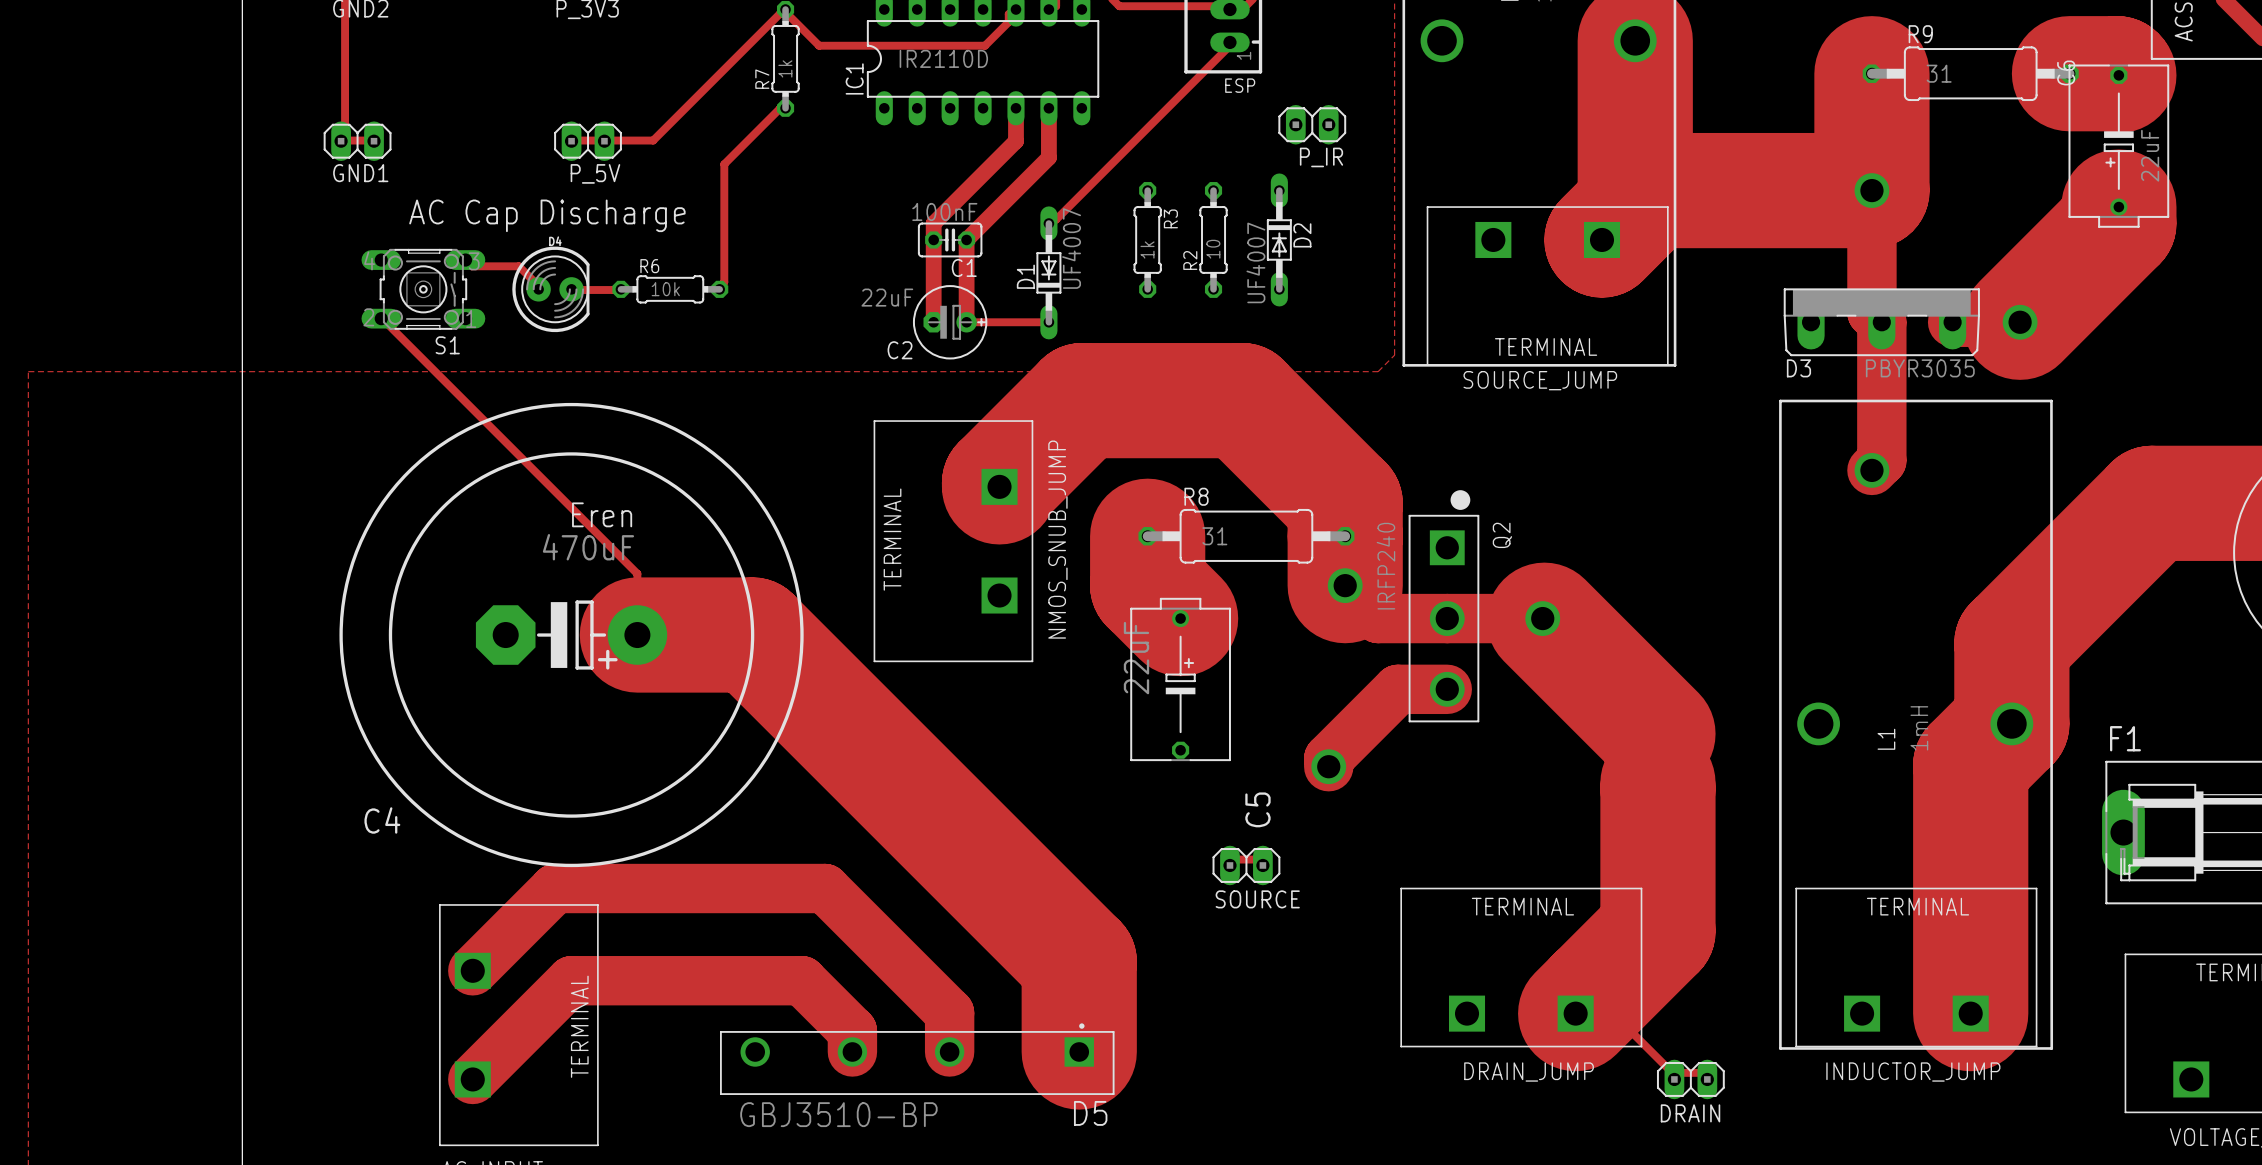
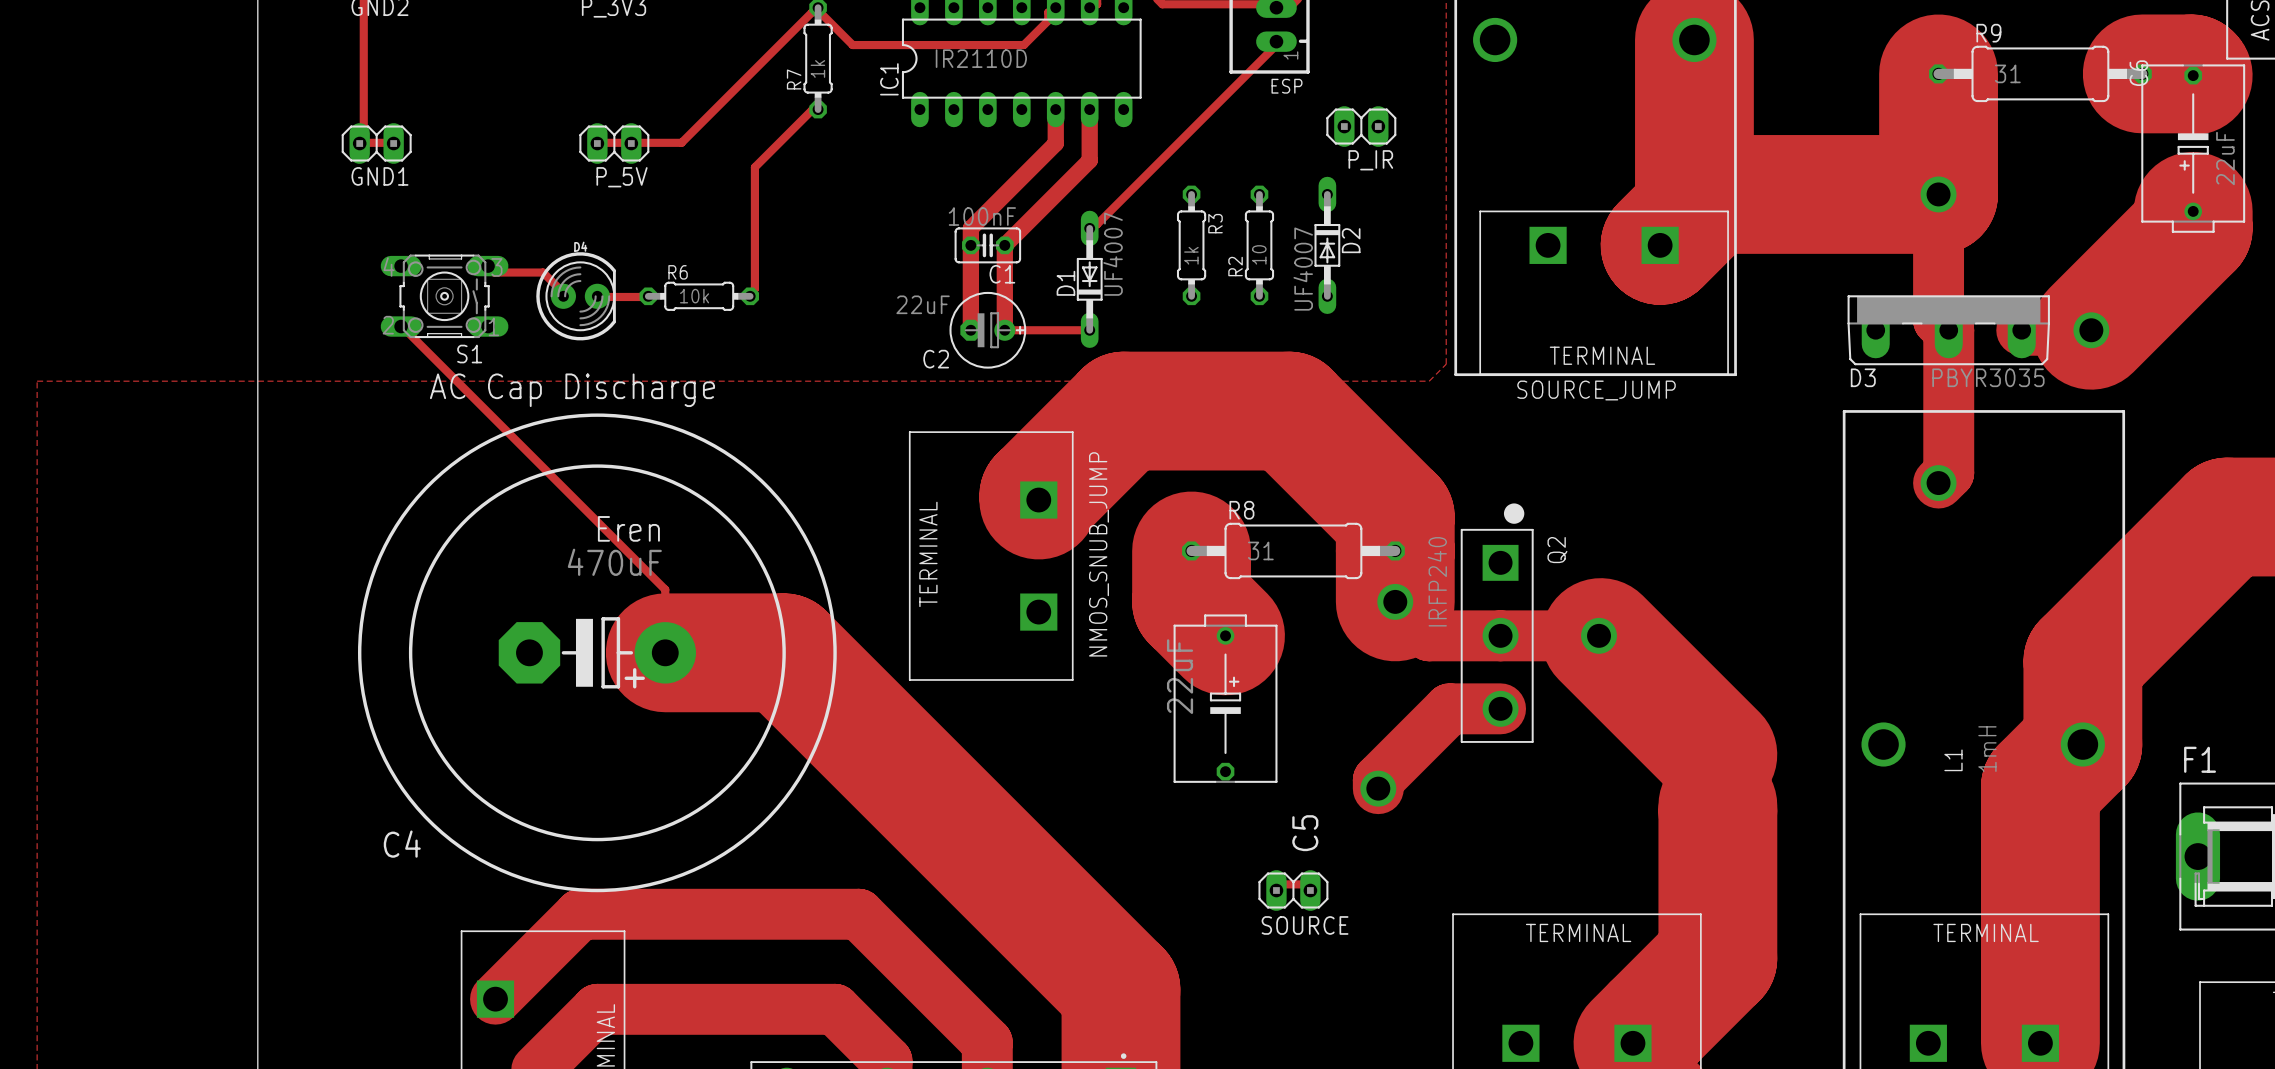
text position: AC Cap Discharge (547, 215) -> AC Cap Discharge (572, 390)

